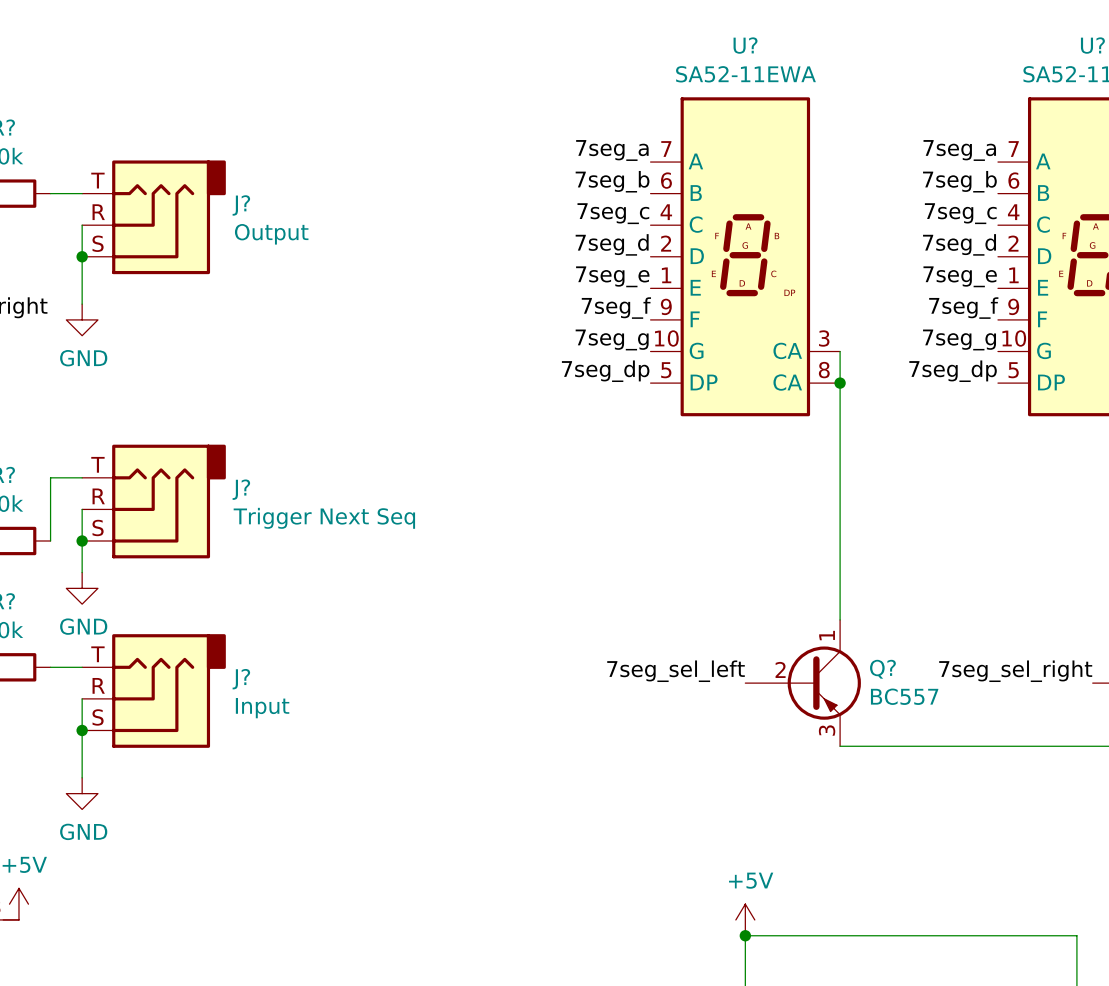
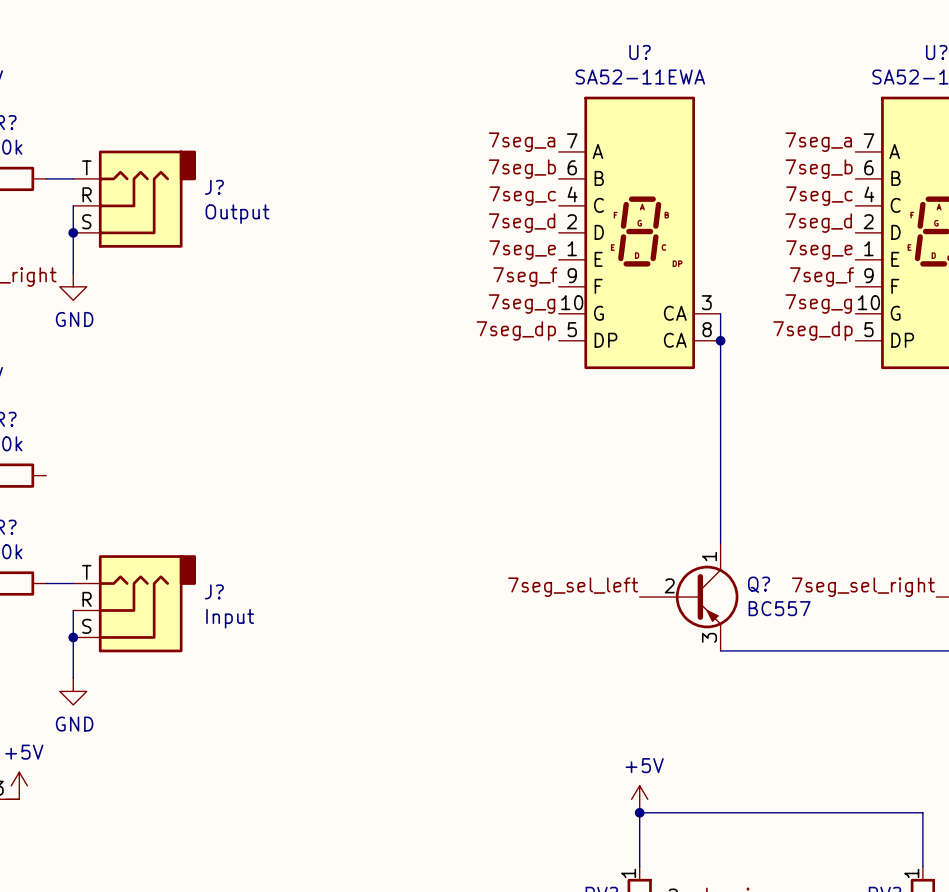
wire: (82, 477) (50, 477) (50, 540) -> none
J?: Trigger Next Seq (153, 501) -> none
wire: (82, 509) (82, 572) -> none
junction: (82, 540) -> none
power symbol: GND (82, 588) -> none

